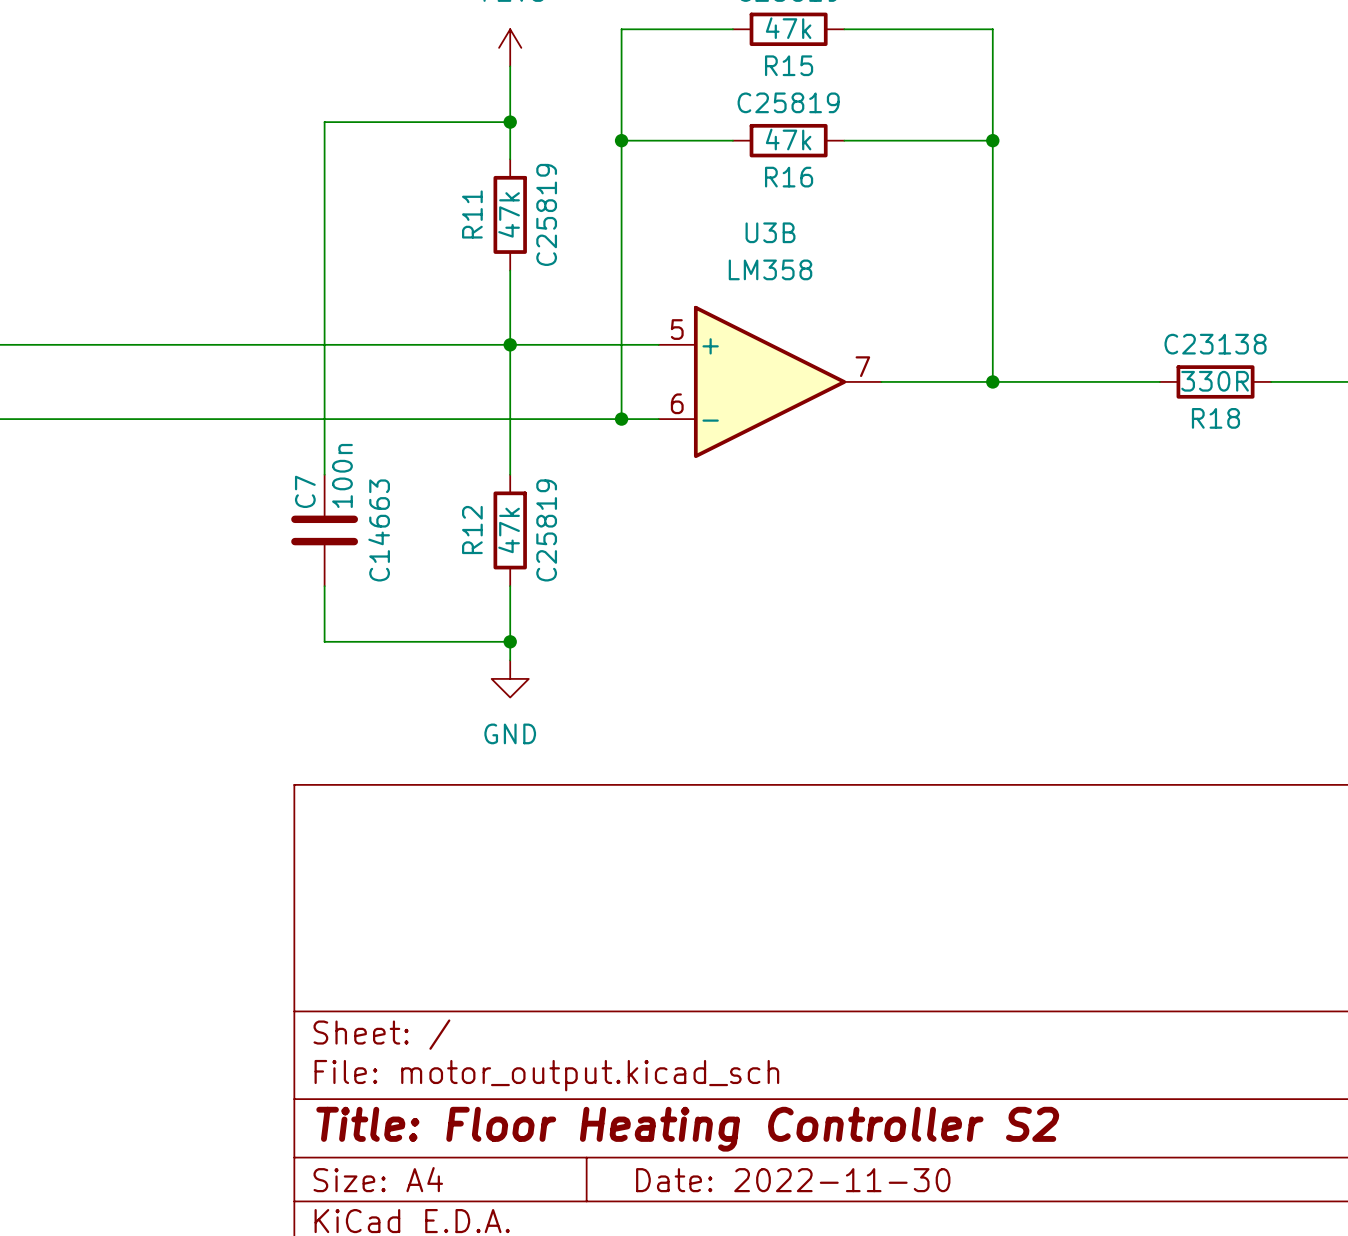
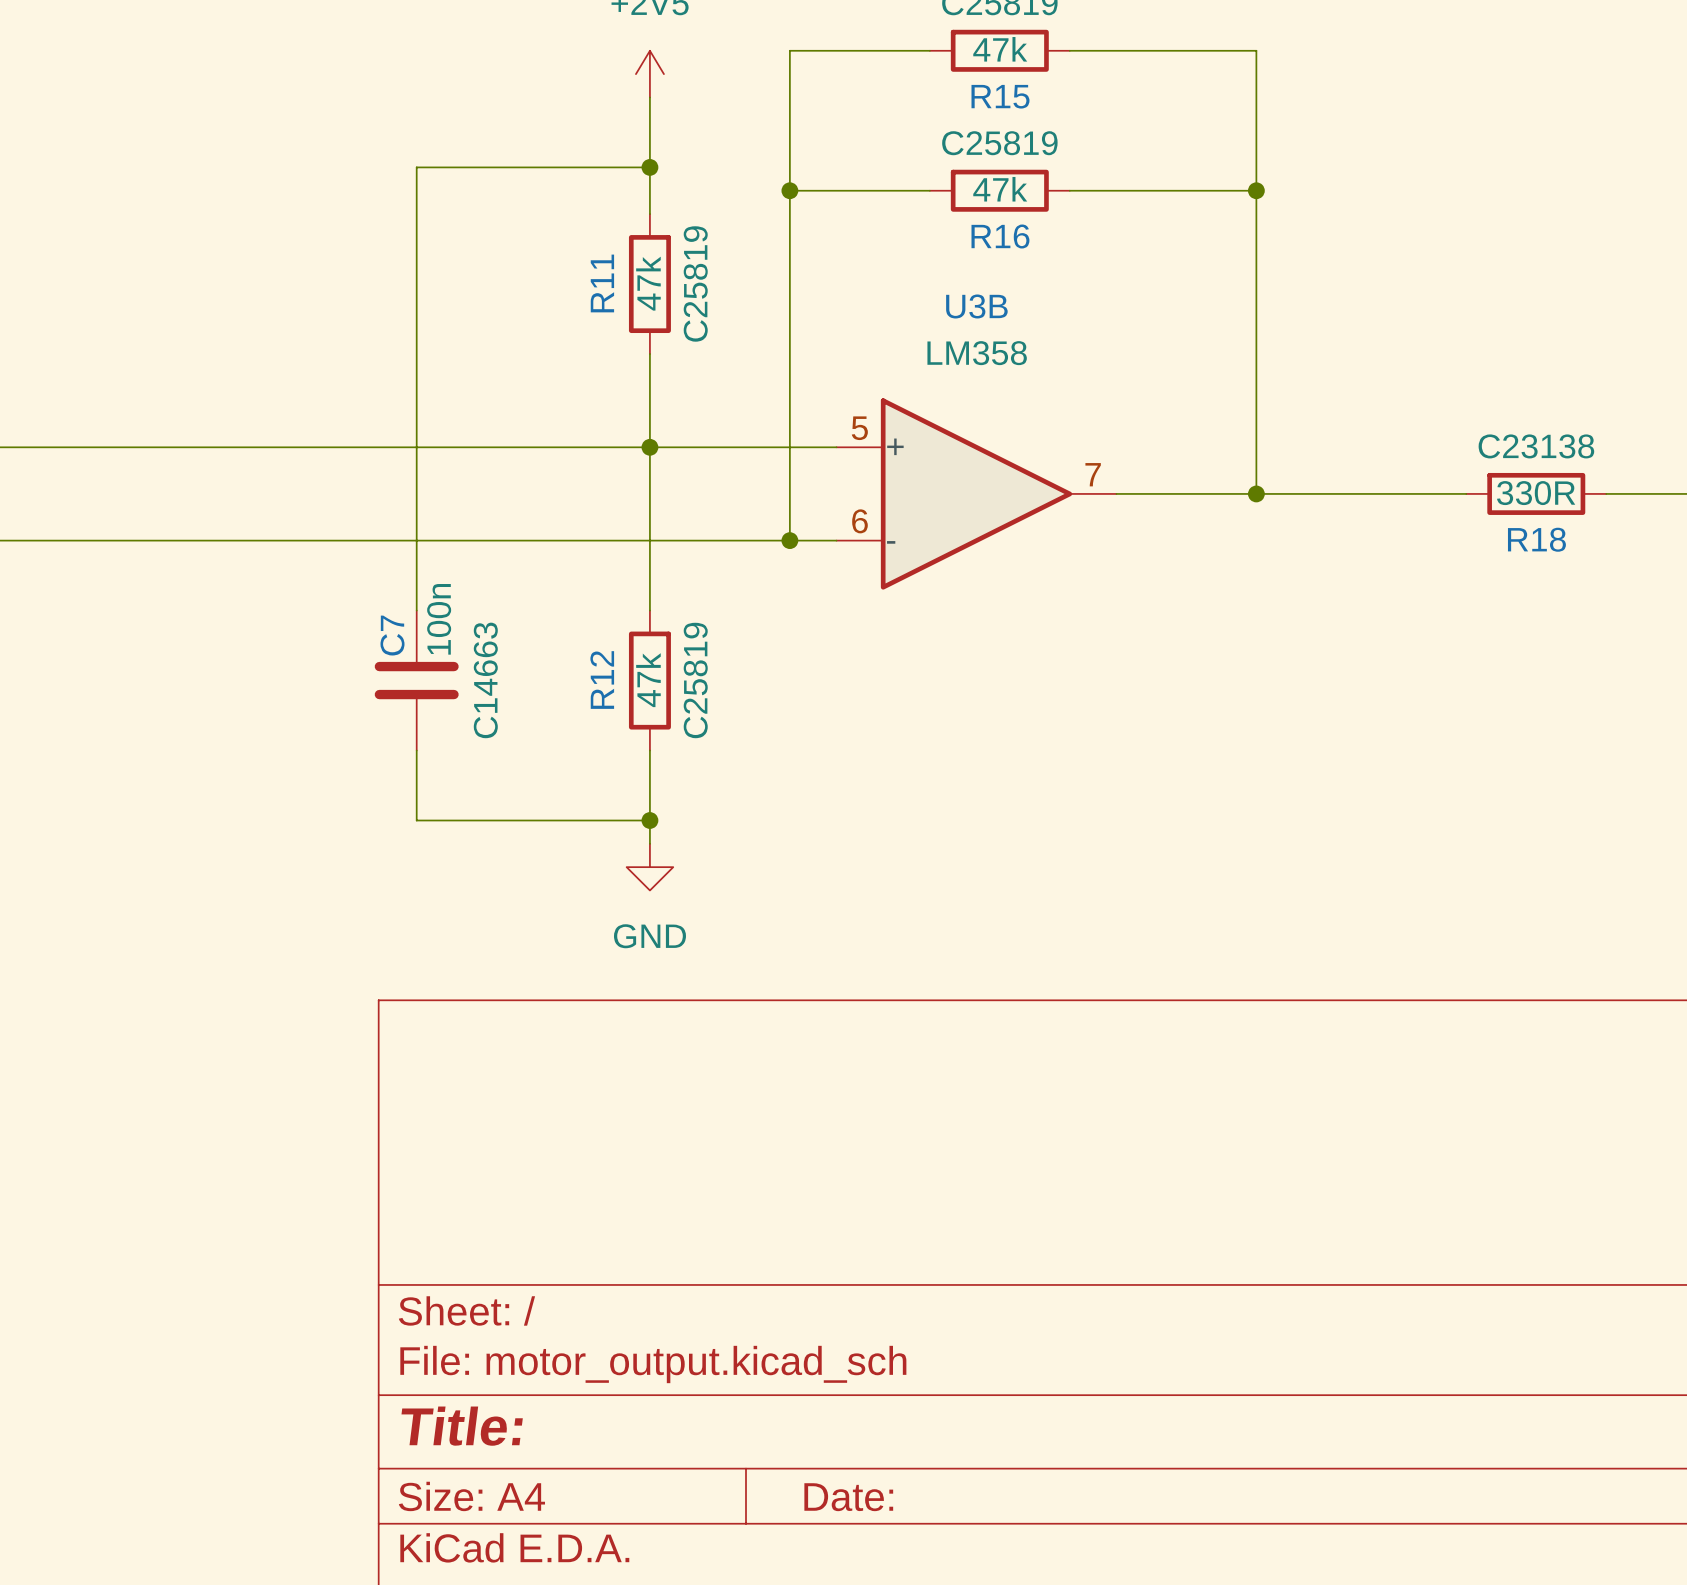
title block: Title: Floor Heating Controller S2 (687, 1129) -> Title: (462, 1426)
title block: Date: 2022-11-30 (793, 1180) -> Date: (848, 1497)

